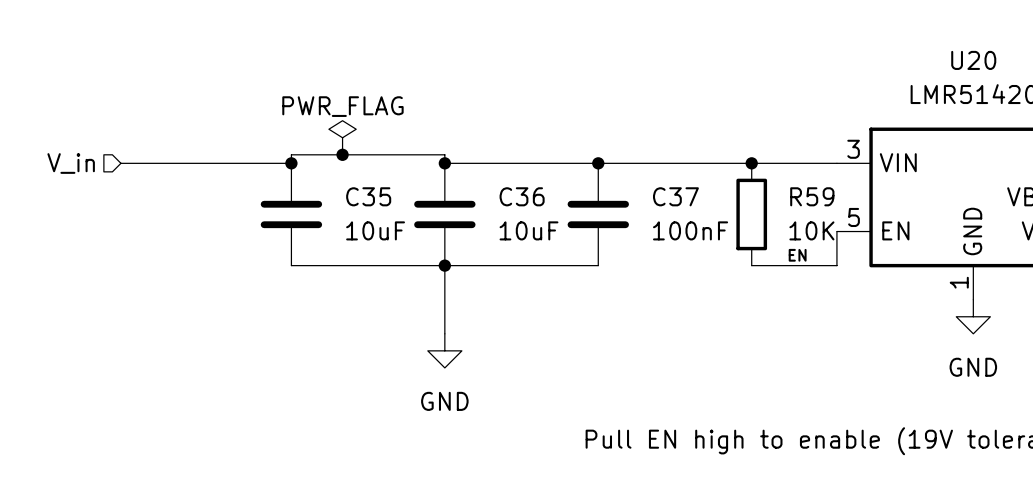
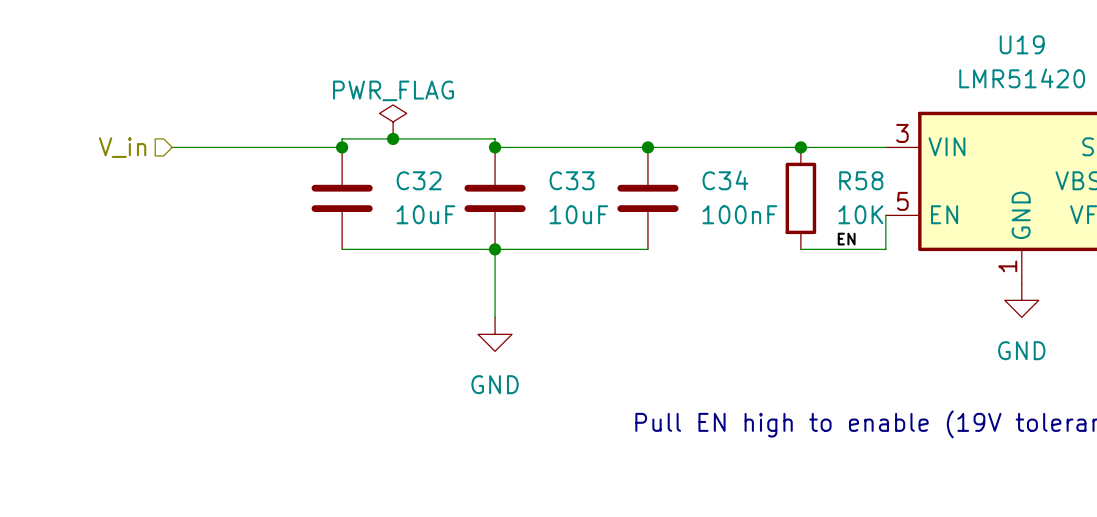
U20 name: U20 (973, 60) -> U19 (1022, 44)
C35 name: C35 (368, 196) -> C32 (419, 180)
C36 name: C36 (522, 196) -> C33 (572, 180)
C37 name: C37 (675, 196) -> C34 (725, 180)
R59 name: R59 (812, 196) -> R58 (861, 180)

